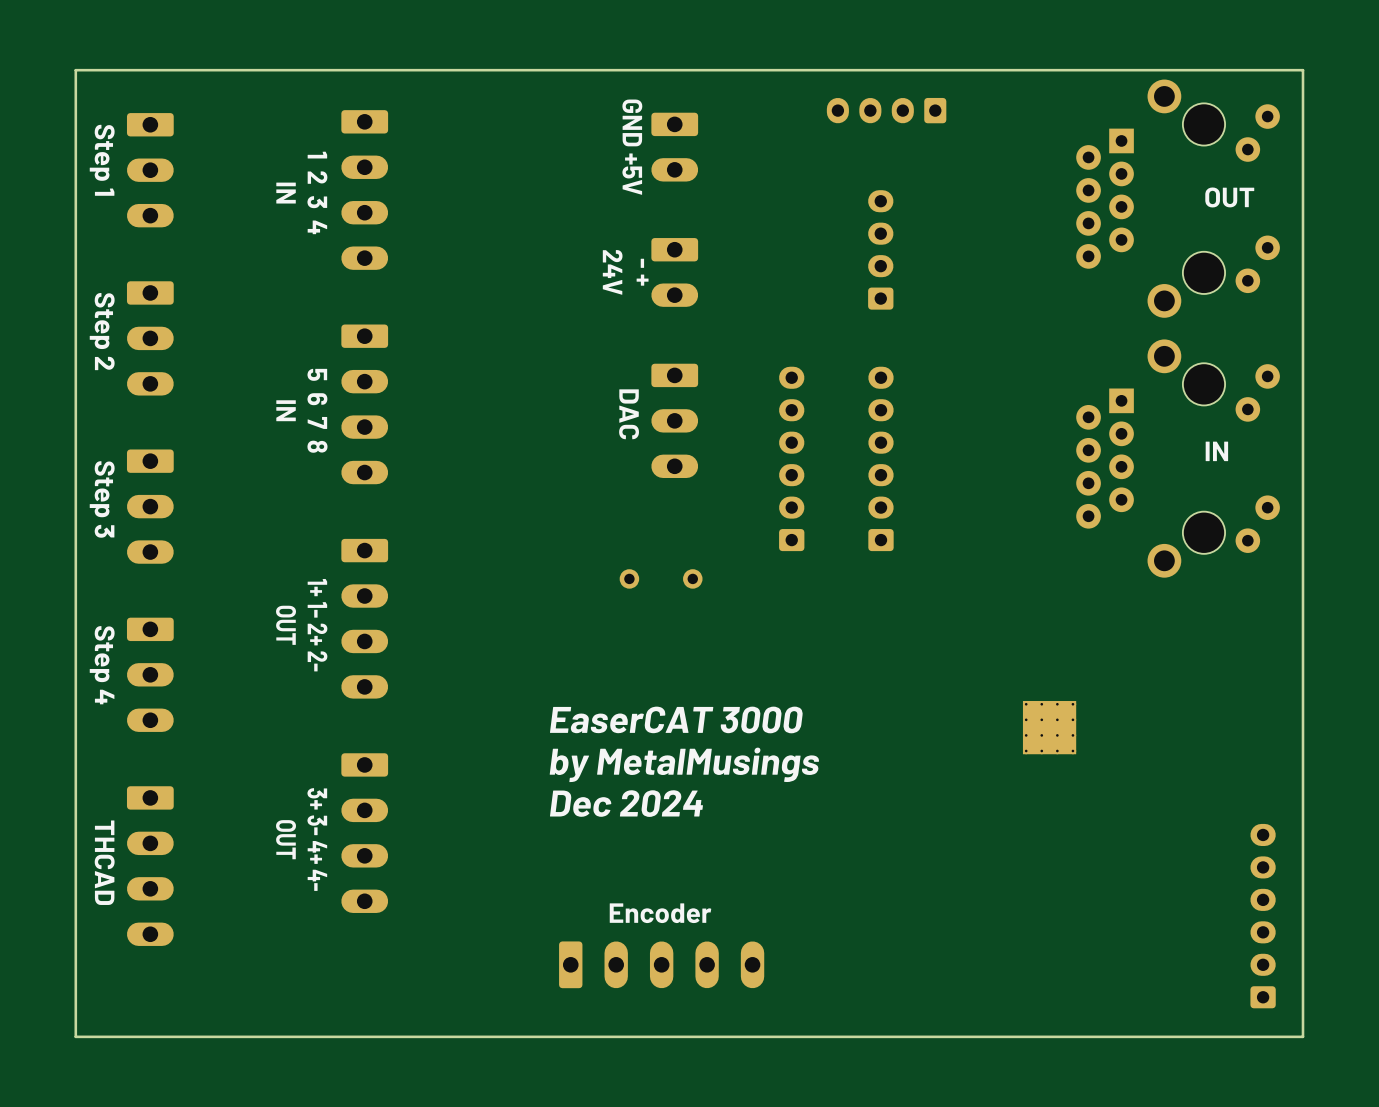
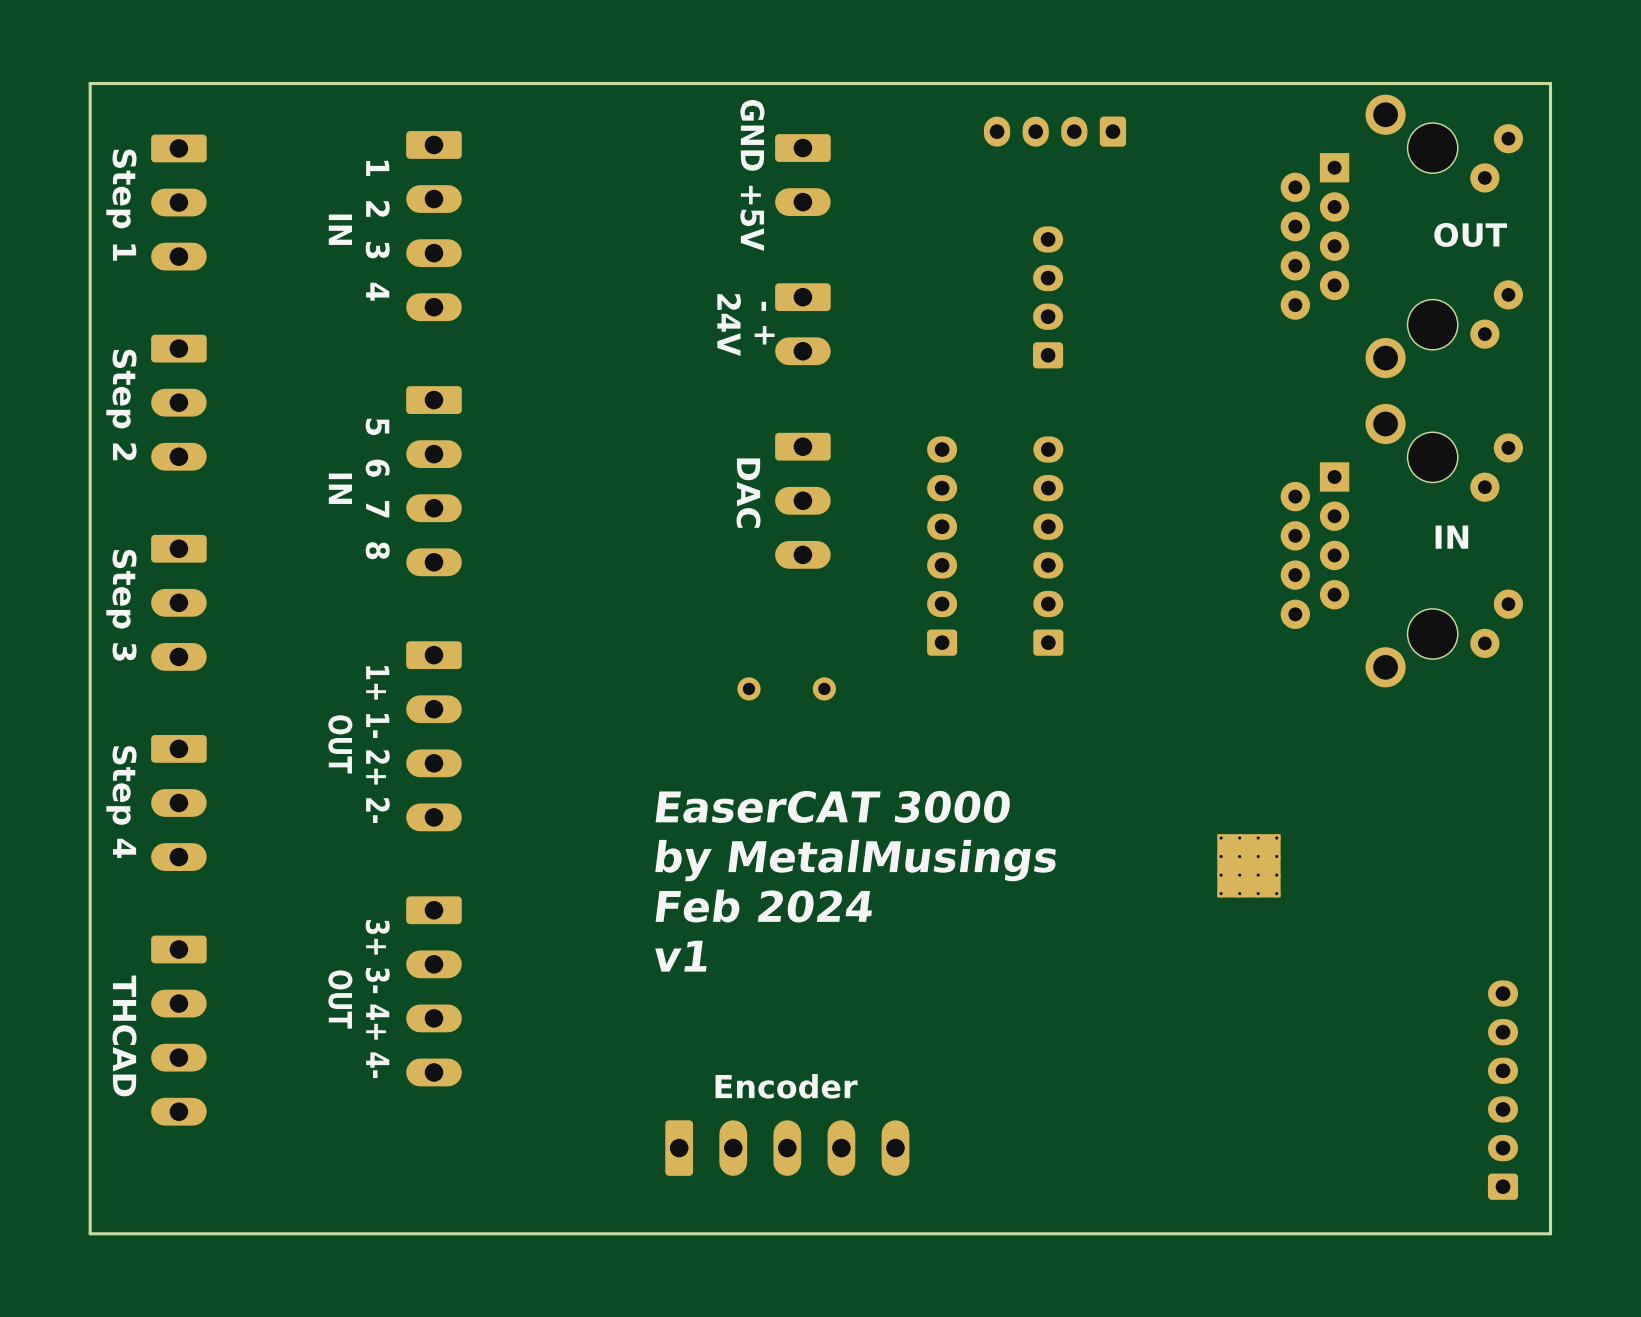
text: none -> EaserCAT 3000 (833, 806)
text: EaserCAT 3000 (676, 719) -> by MetalMusings (855, 860)
text: by MetalMusings (684, 764) -> Feb 2024 (763, 906)
text: Dec 2024 (626, 803) -> v1 (680, 956)

